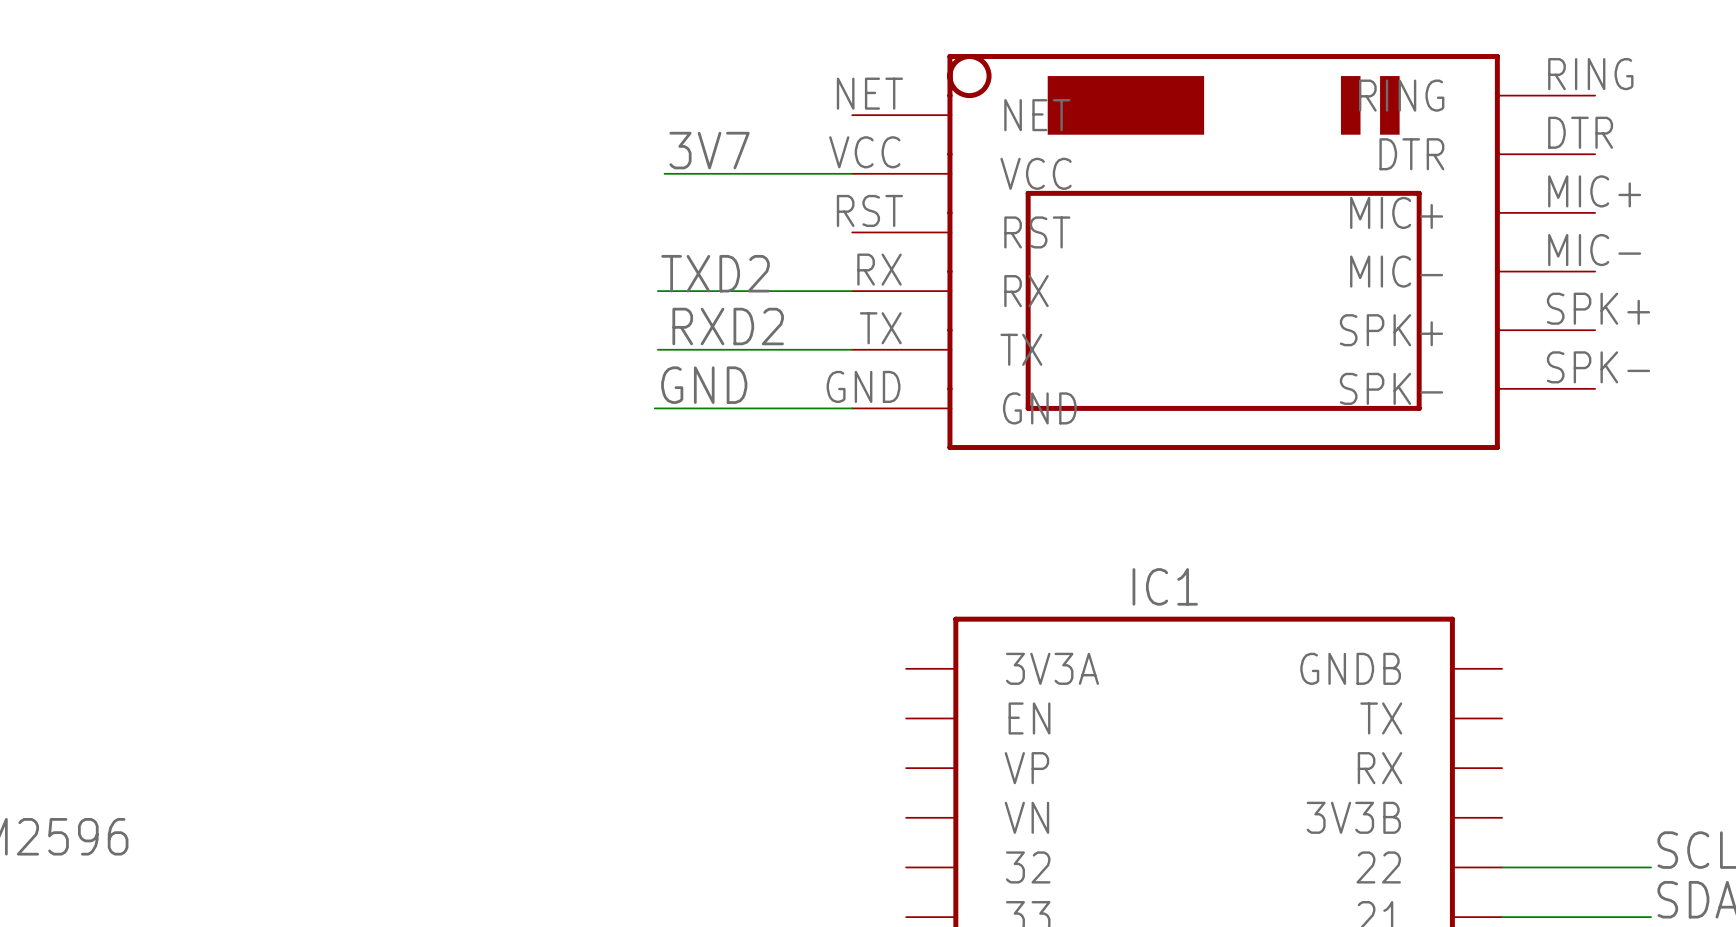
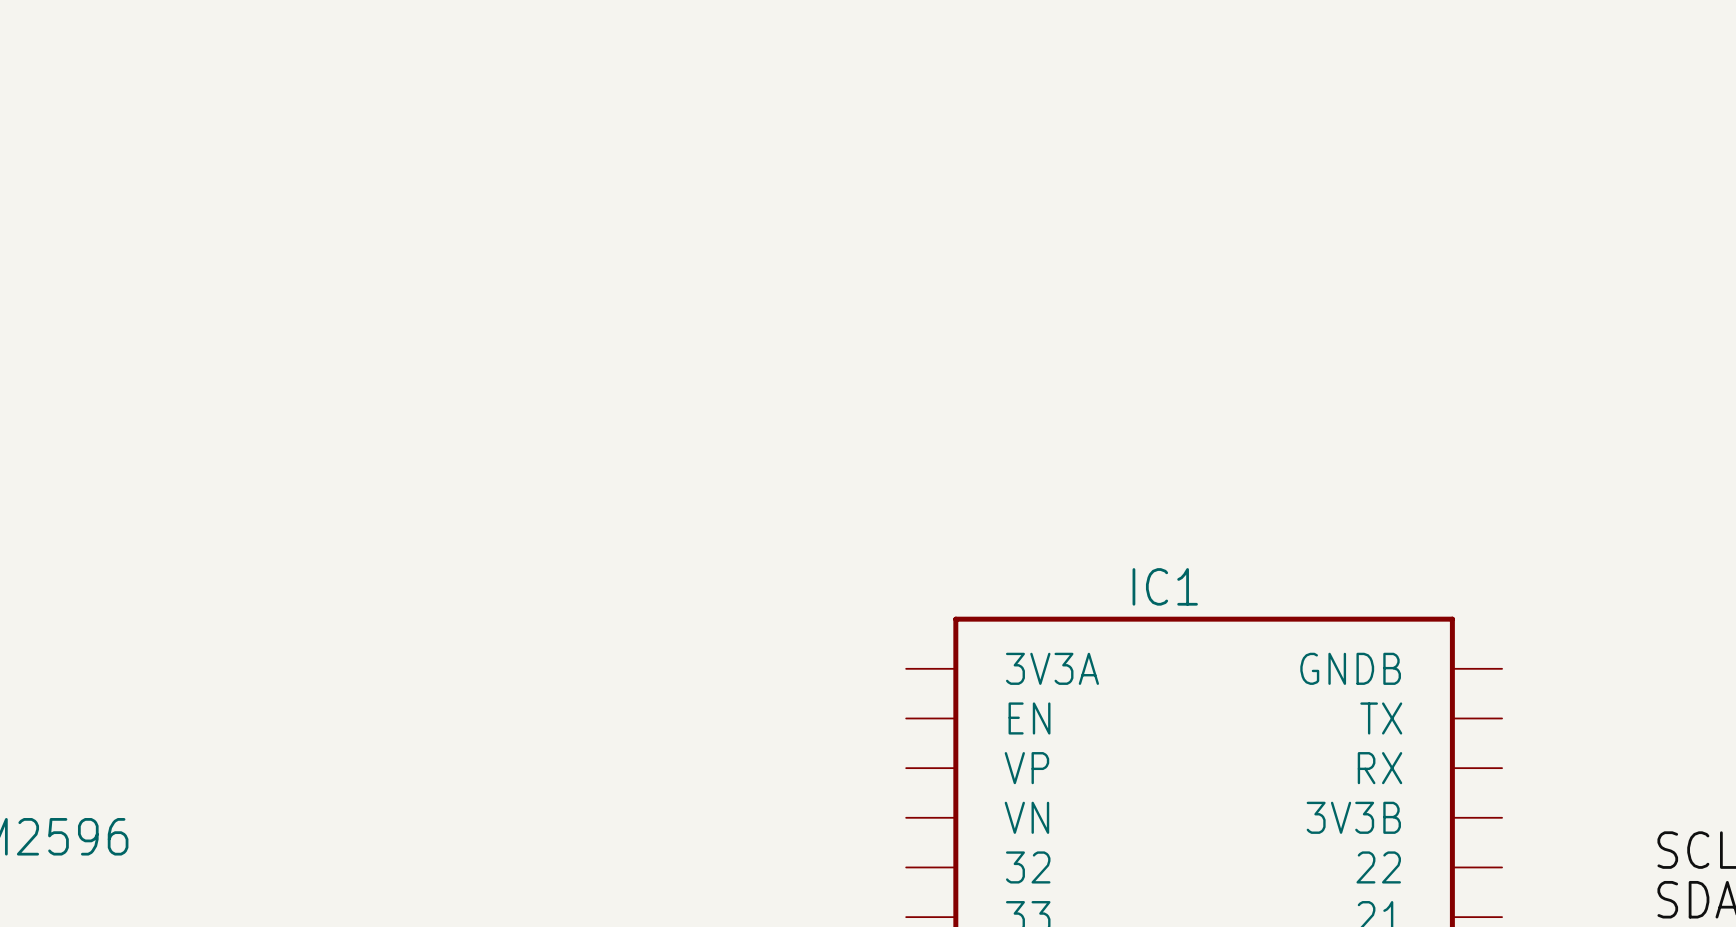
label: 3V7 (709, 150) -> none
wire: (664, 173) (852, 173) -> none
part: (1223, 252) -> none
label: TXD2 (715, 273) -> none
wire: (657, 291) (852, 291) -> none
label: RXD2 (728, 326) -> none
wire: (657, 349) (852, 349) -> none
label: GND (704, 385) -> none
wire: (654, 408) (852, 408) -> none
wire: (1502, 867) (1651, 867) -> none
wire: (1502, 917) (1651, 917) -> none

